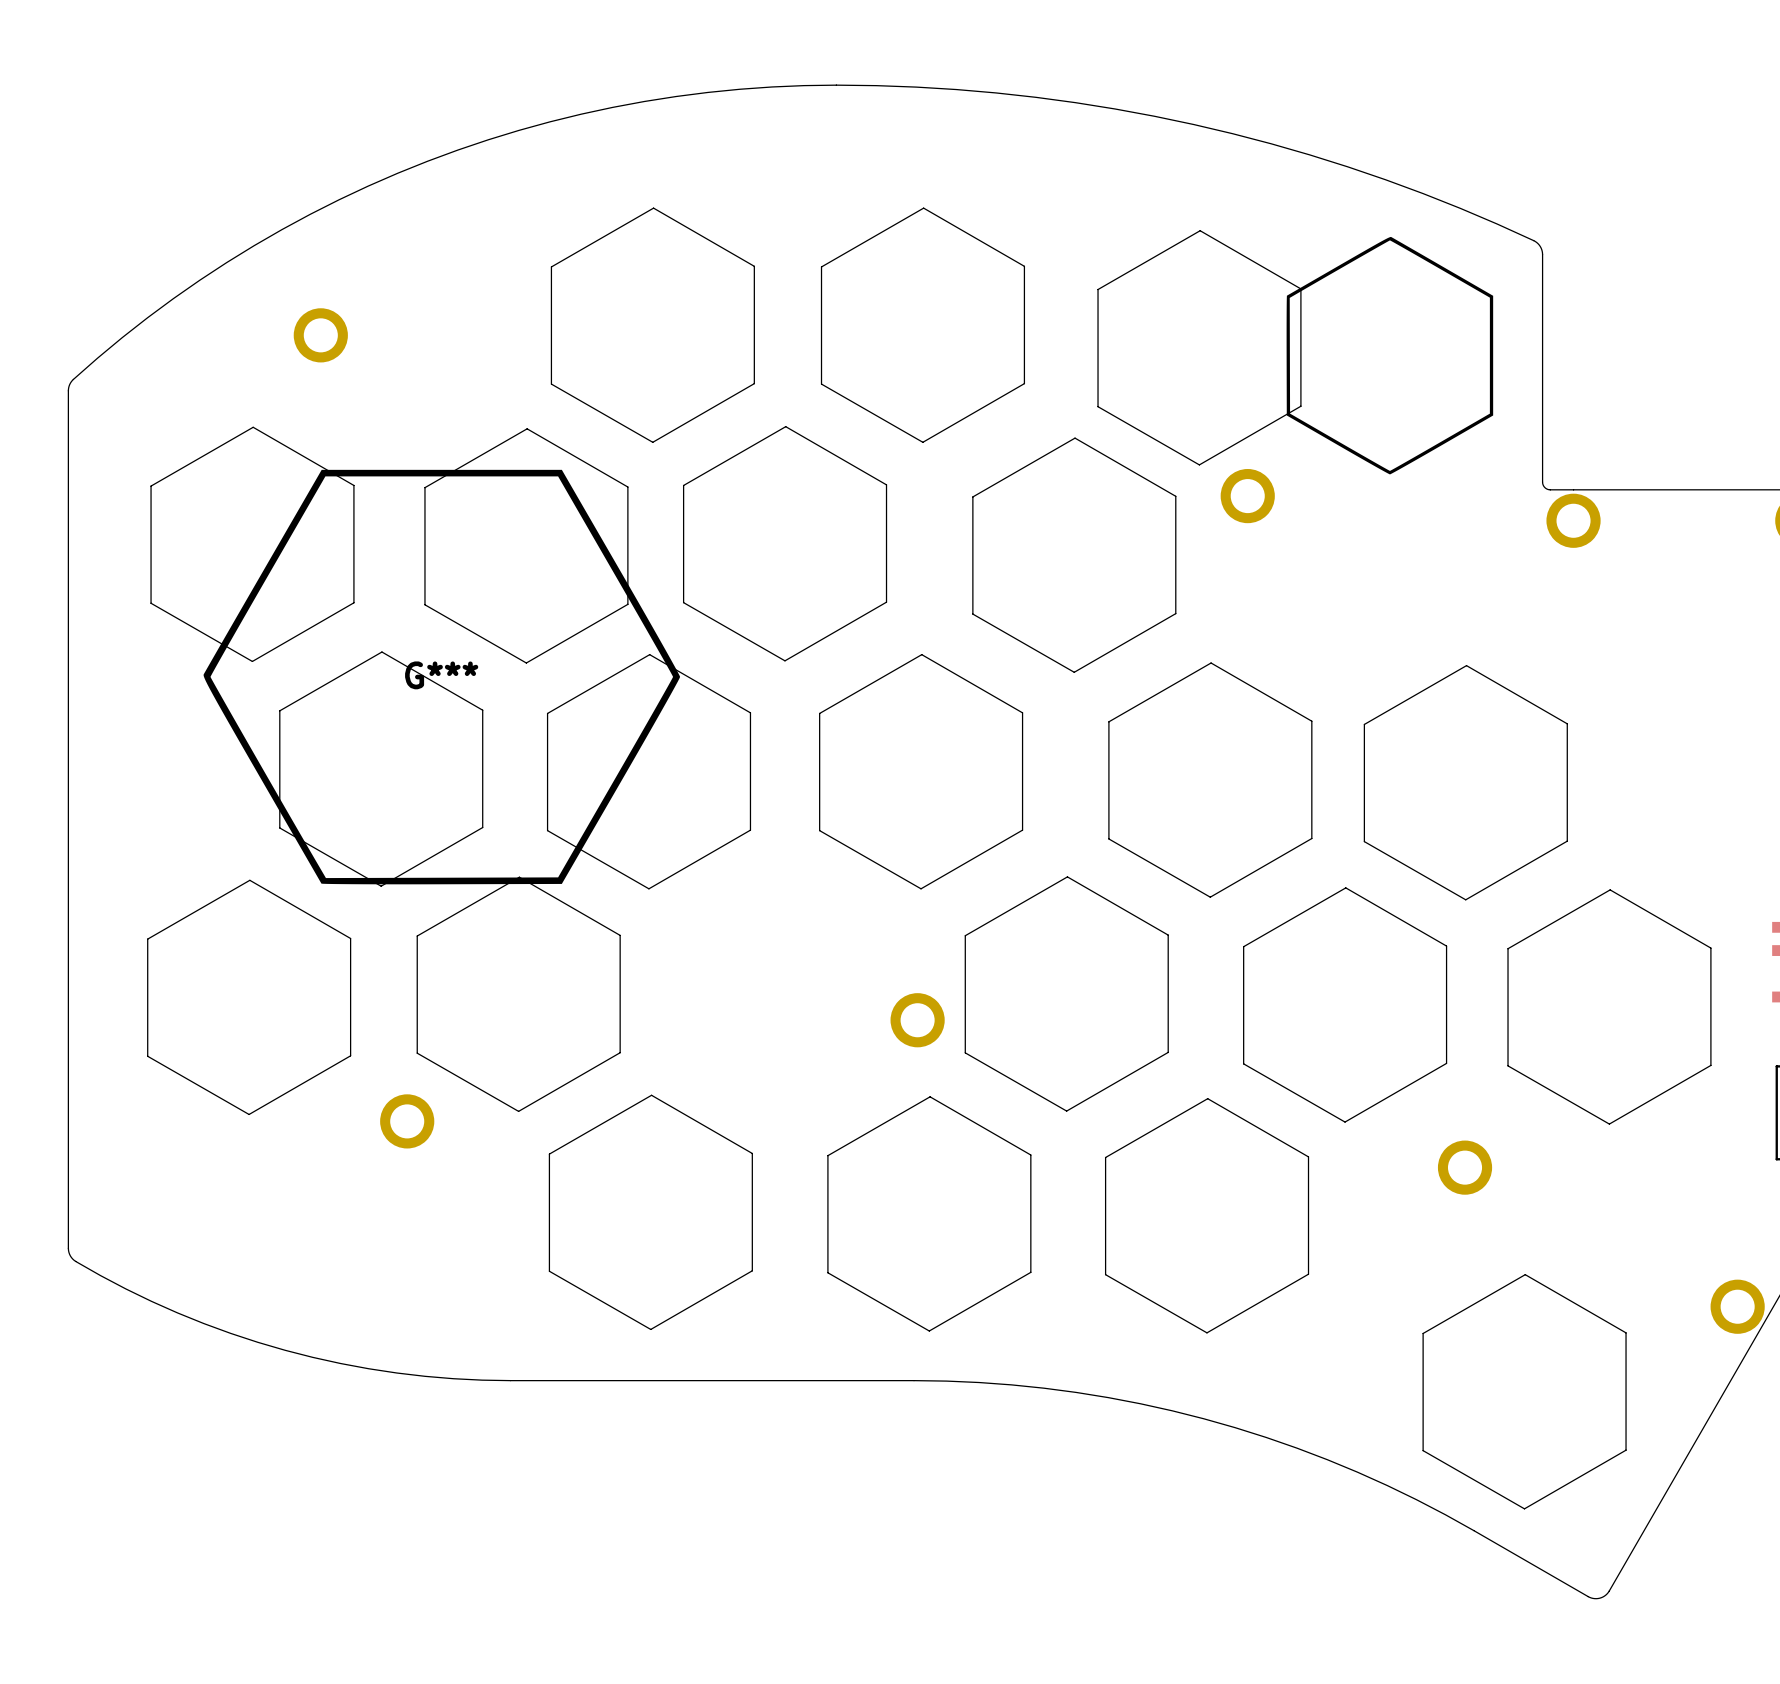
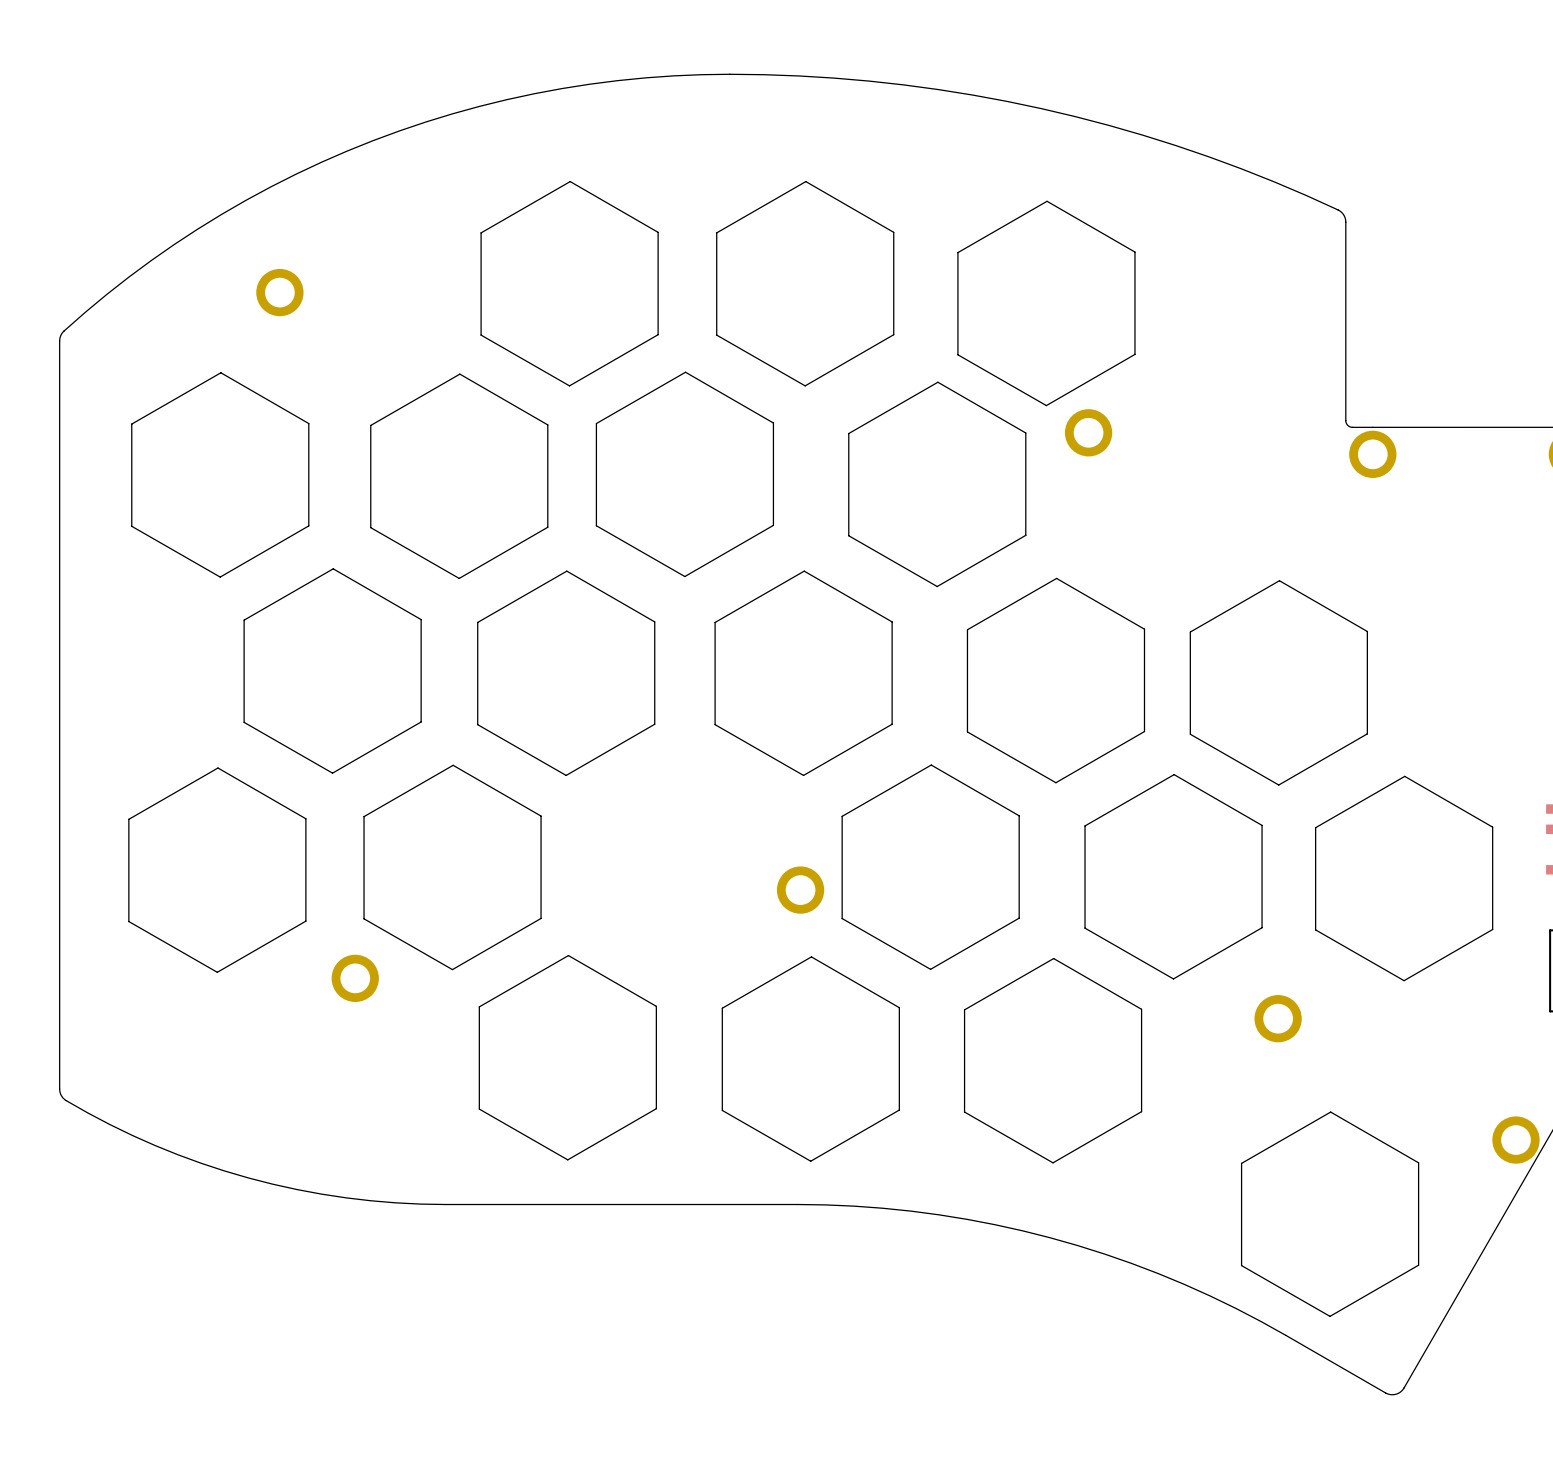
drawing: [1286, 236, 1494, 475] -> none
G***: (441, 677) -> none

